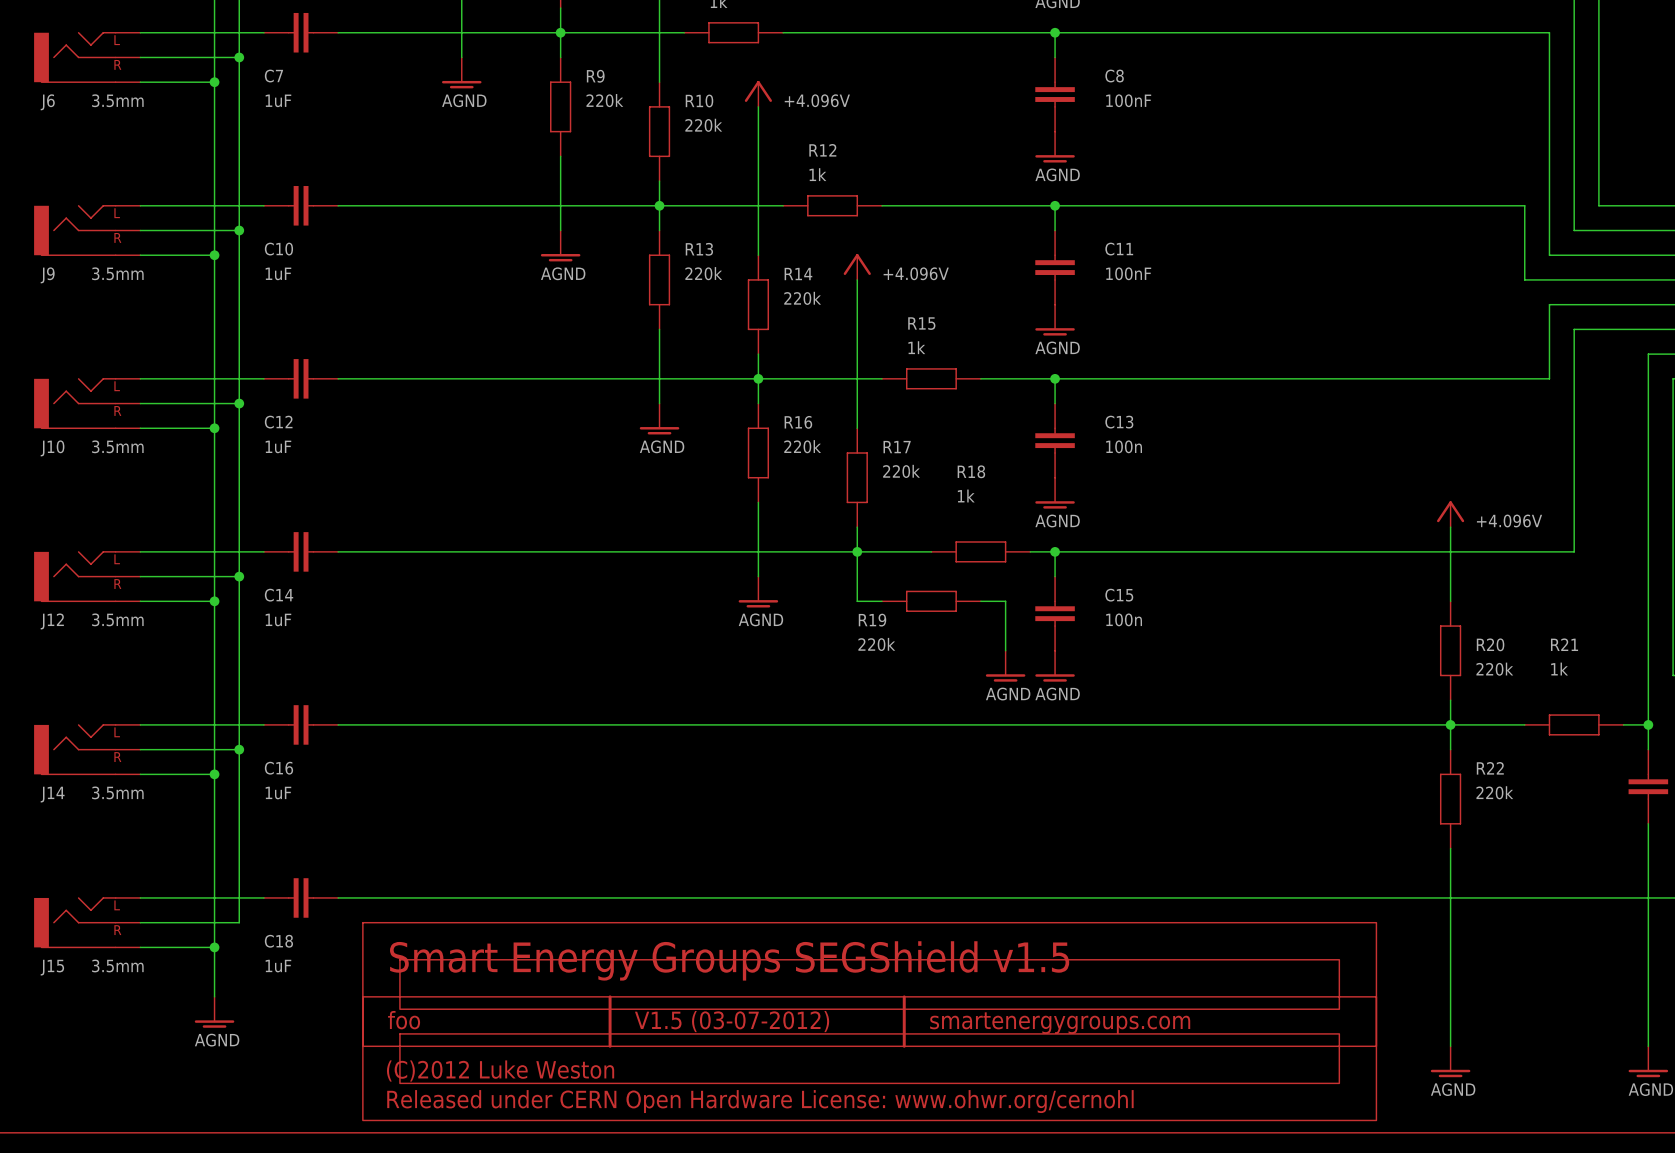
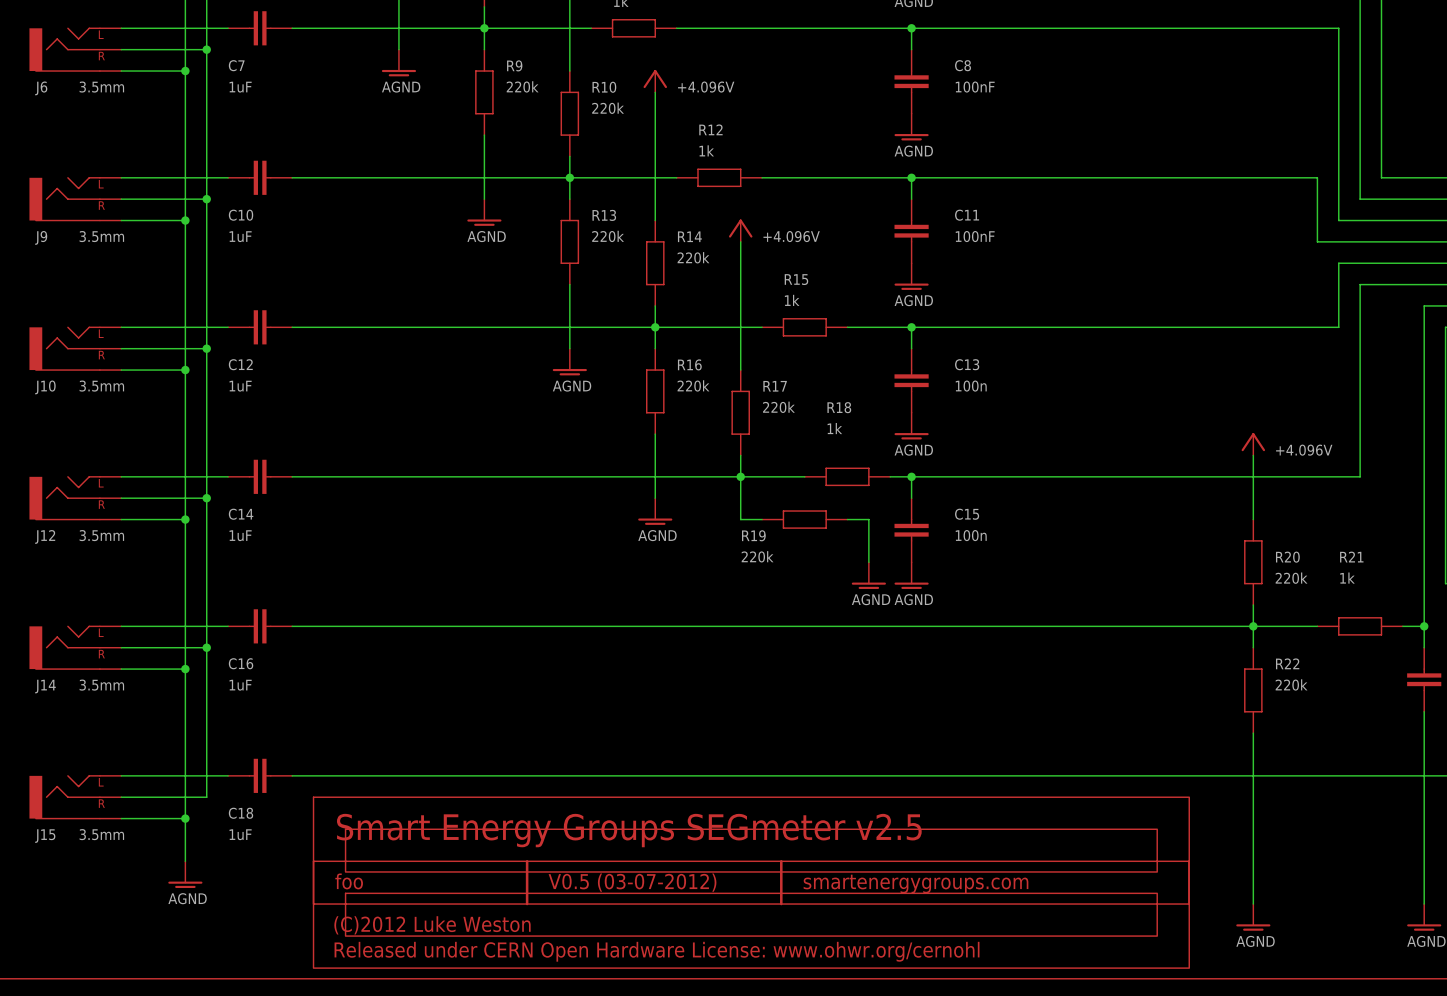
text: Smart Energy Groups SEGShield v1.5 (729, 960) -> Smart Energy Groups SEGmeter v2.5 (629, 830)
text: V1.5 (03-07-2012) (732, 1021) -> V0.5 (03-07-2012) (632, 882)

